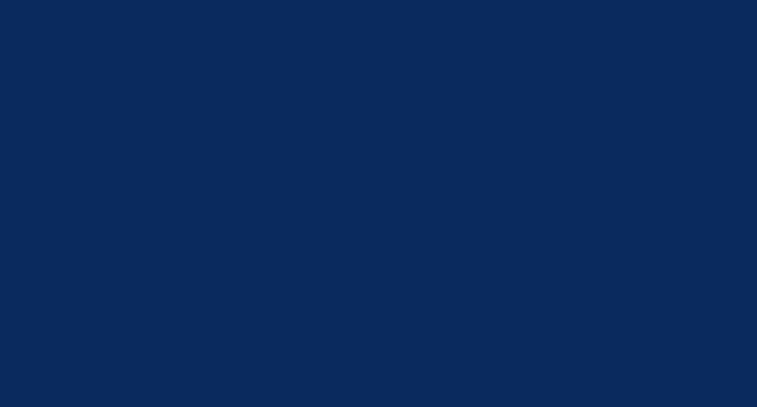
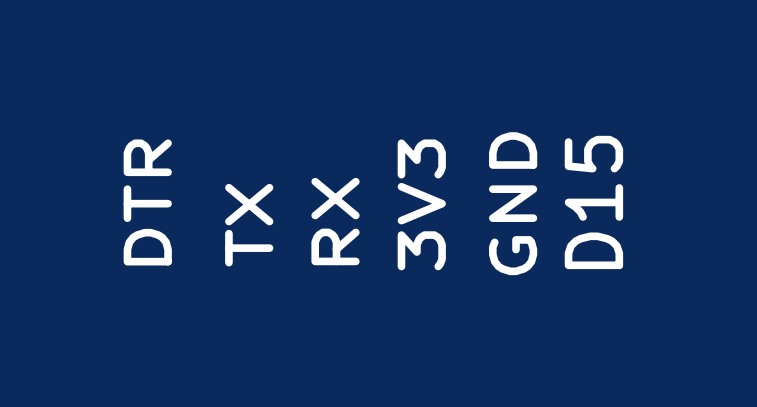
text: none -> DTR (147, 202)
text: none -> D15 (593, 202)
text: none -> GND (513, 203)
text: none -> 3V3 (421, 204)
text: none -> RX (335, 221)
text: none -> TX (249, 225)

